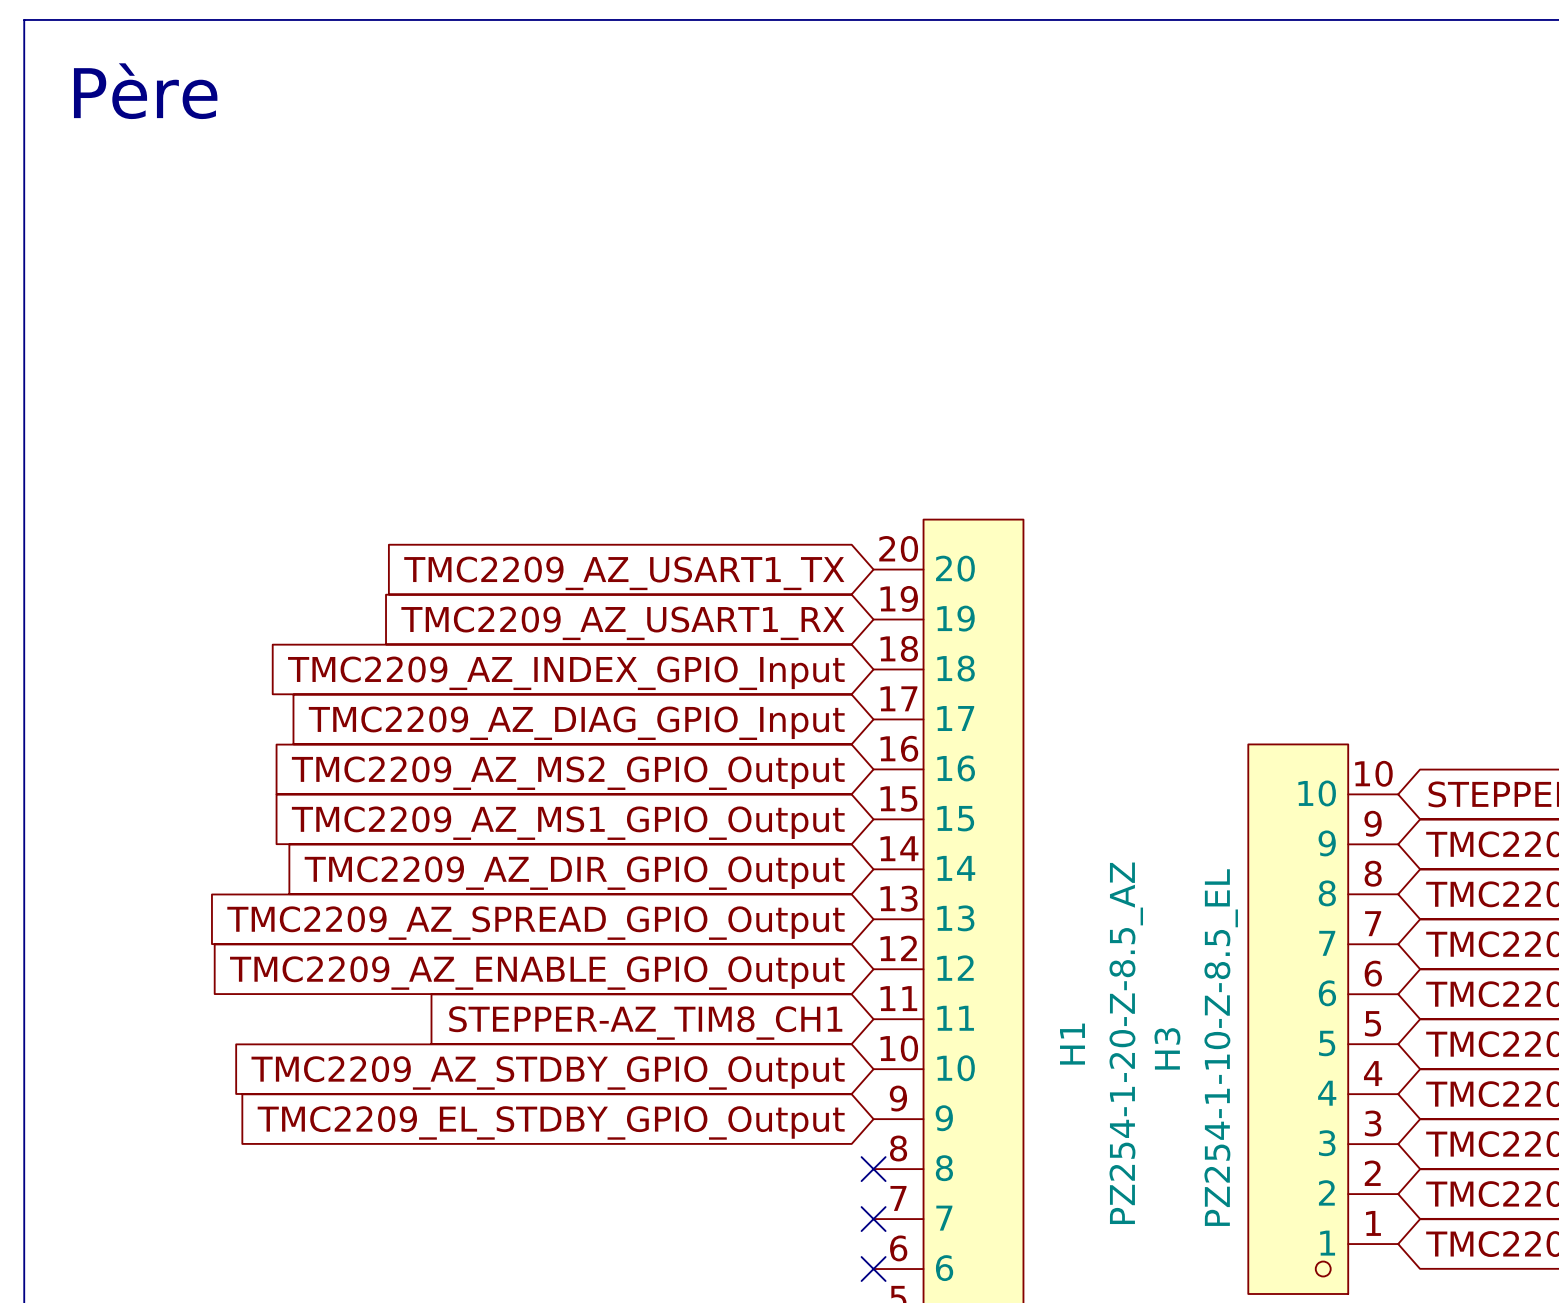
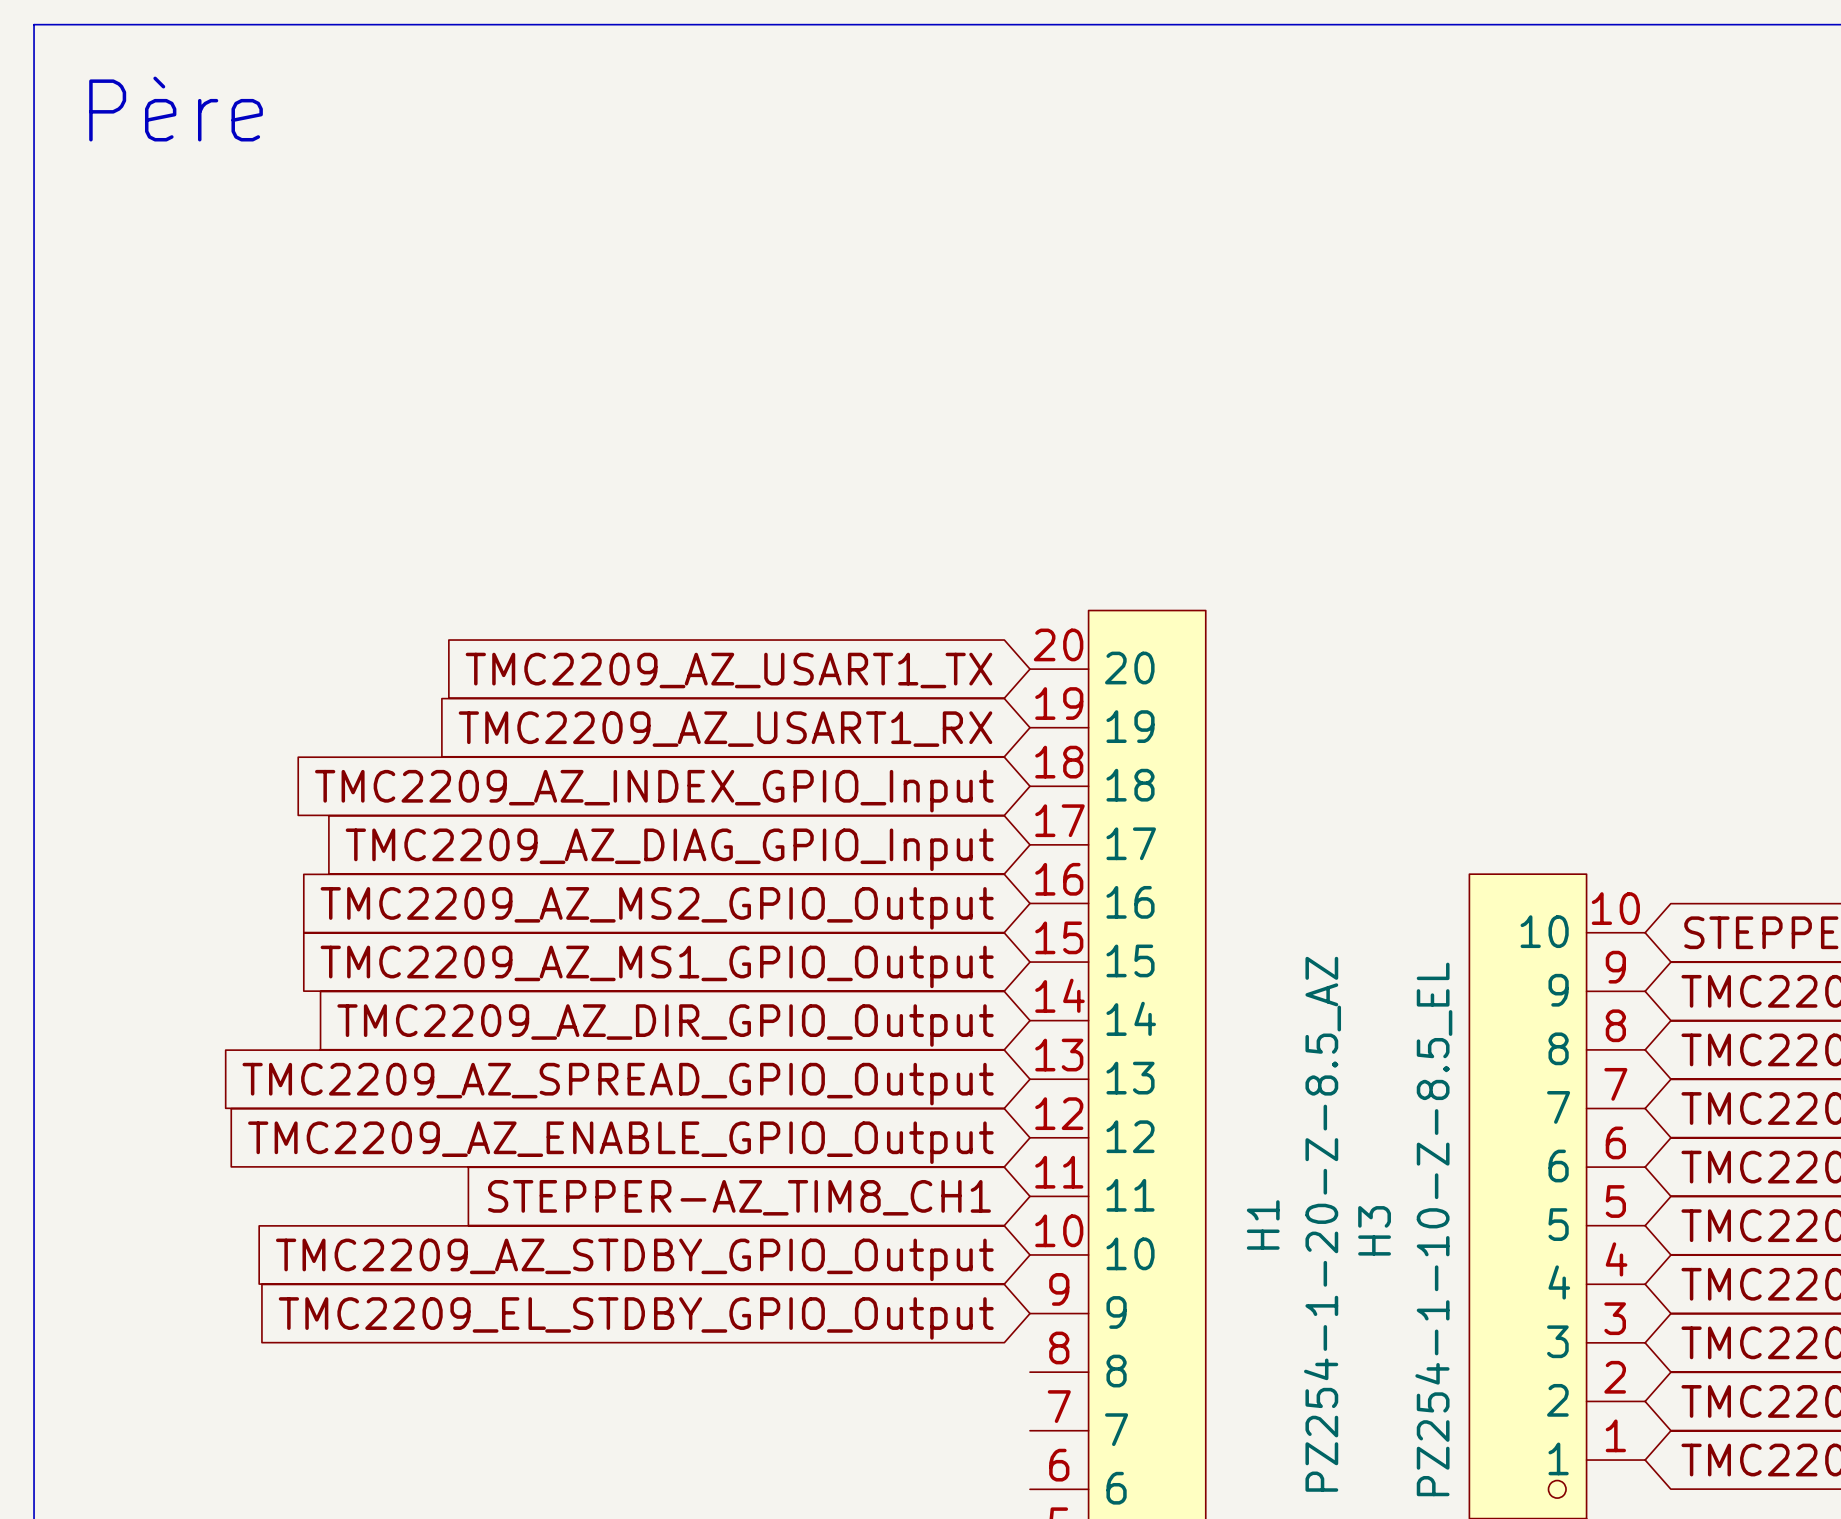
no-connect mark: (873, 1169) -> none
no-connect mark: (873, 1219) -> none
no-connect mark: (873, 1269) -> none

